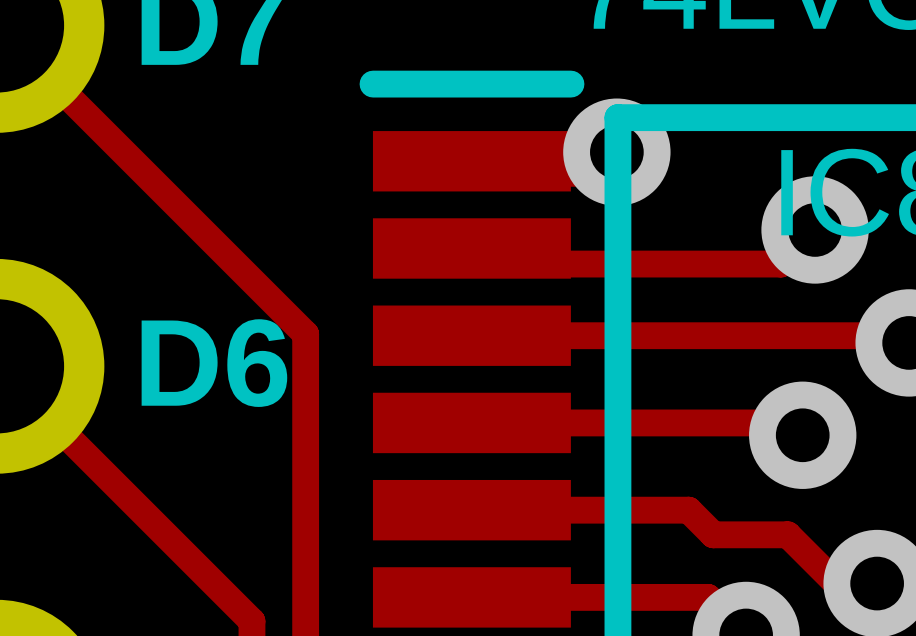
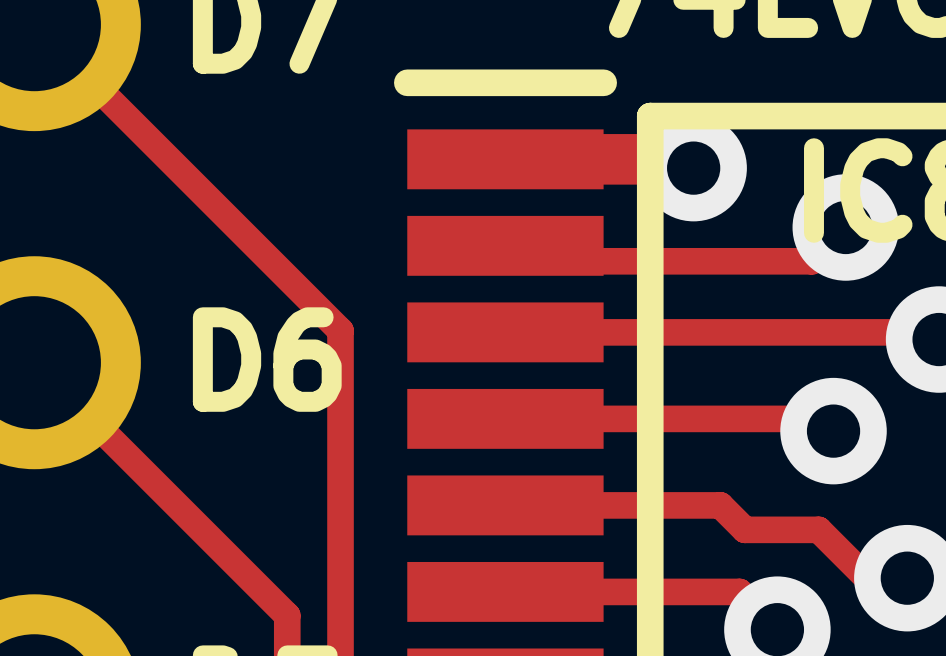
via position: (616, 152) -> (693, 168)

